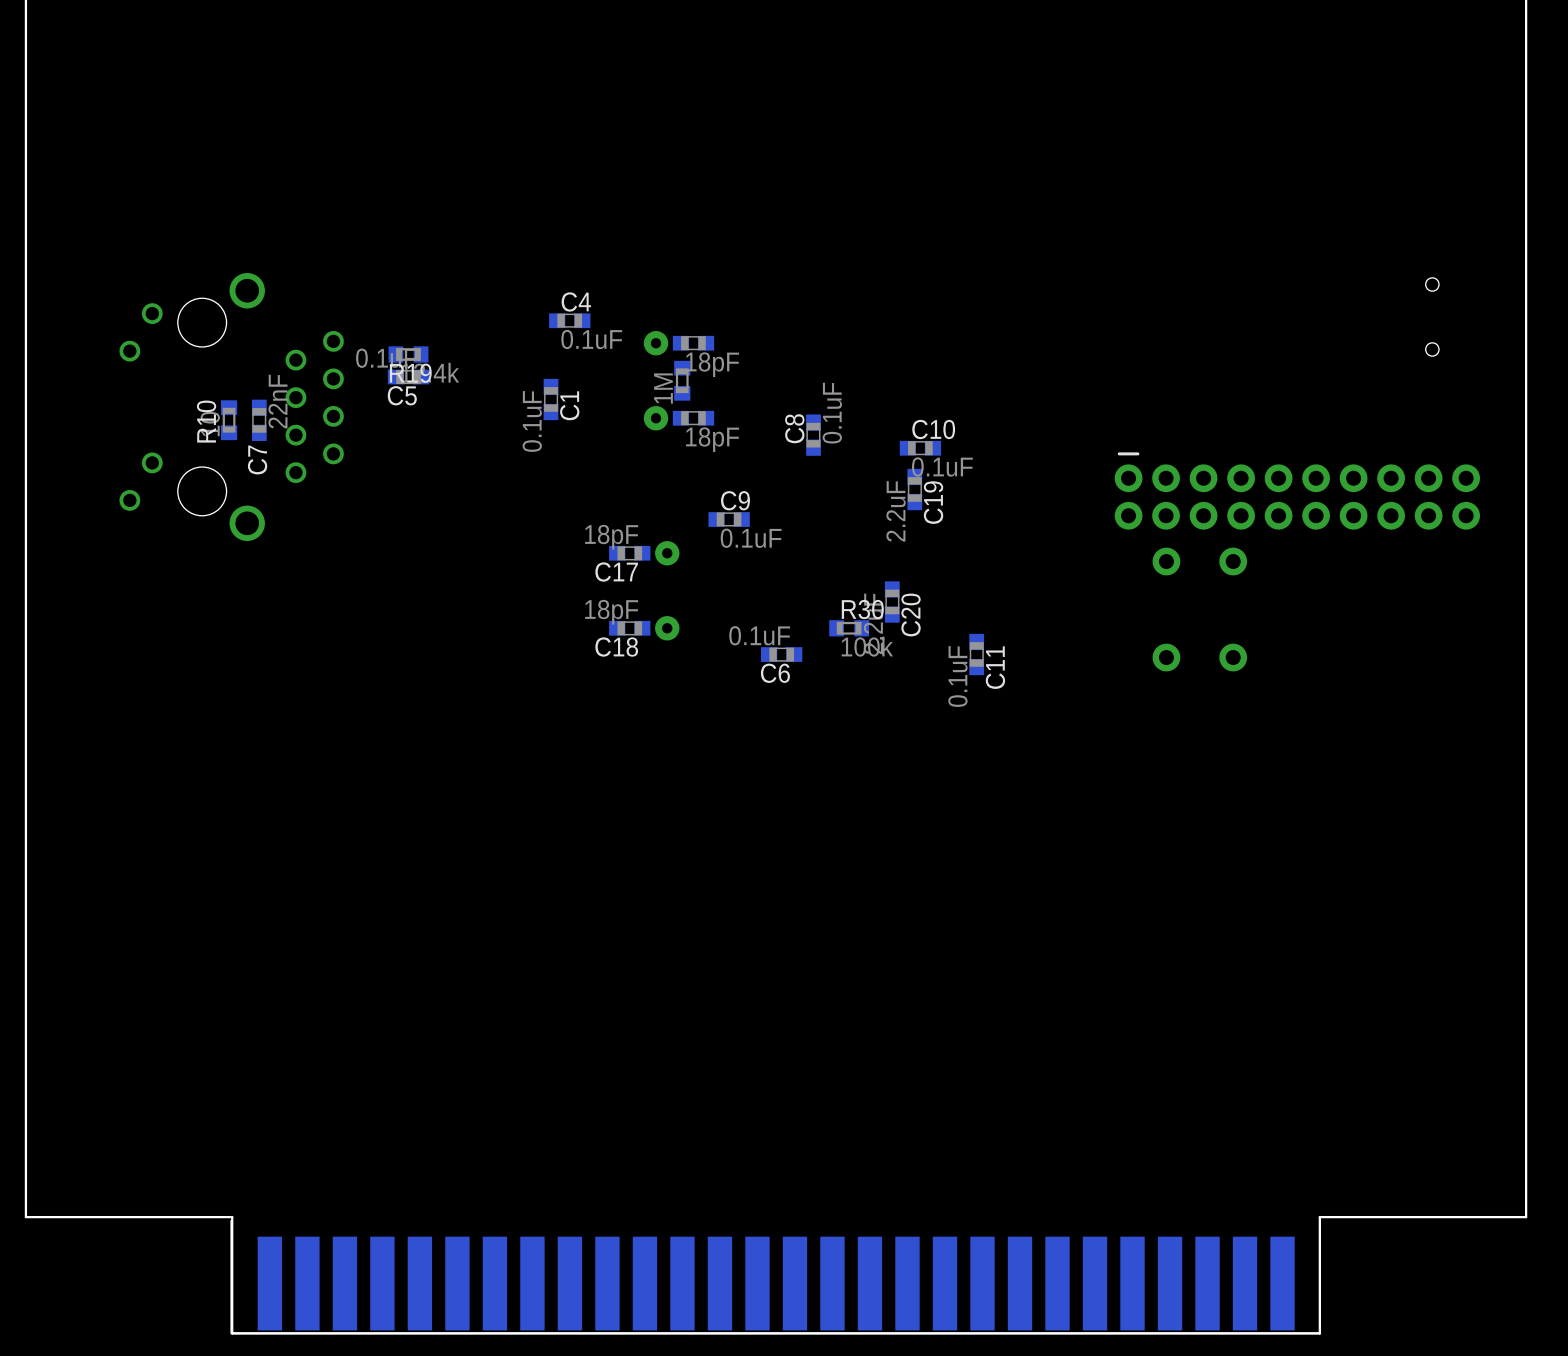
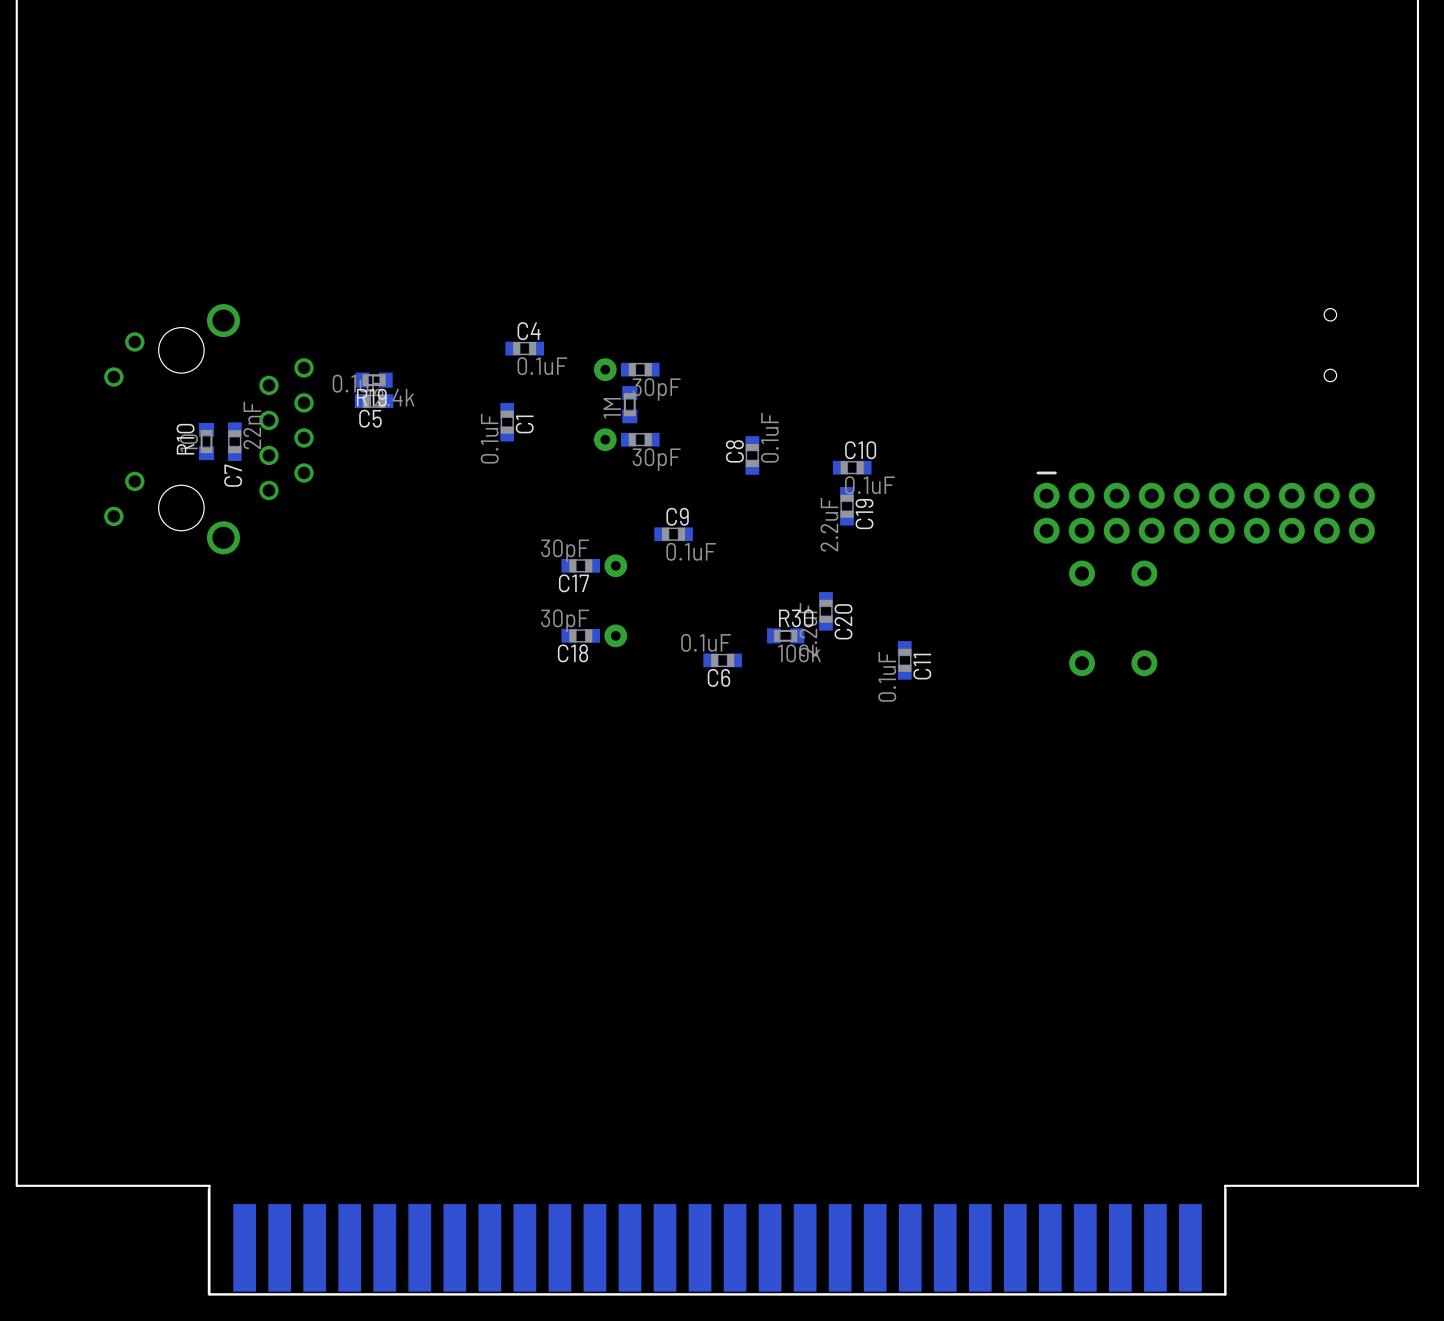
part value: 18pF (712, 364) -> 30pF (656, 389)
part value: 18pF (712, 439) -> 30pF (656, 459)
C17 value: 18pF (611, 537) -> 30pF (565, 550)
C18 value: 18pF (611, 612) -> 30pF (565, 620)

